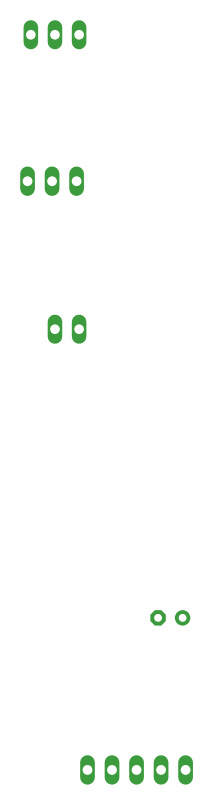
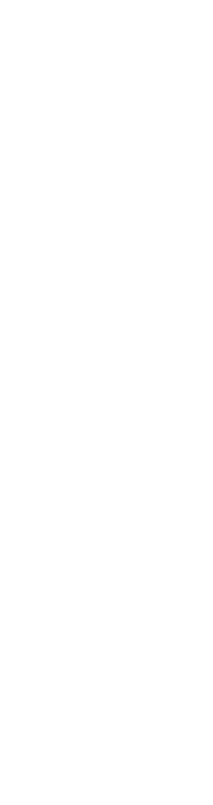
part: (54, 34) -> none
part: (52, 181) -> none
part: (67, 329) -> none
part: (170, 617) -> none
part: (136, 769) -> none

